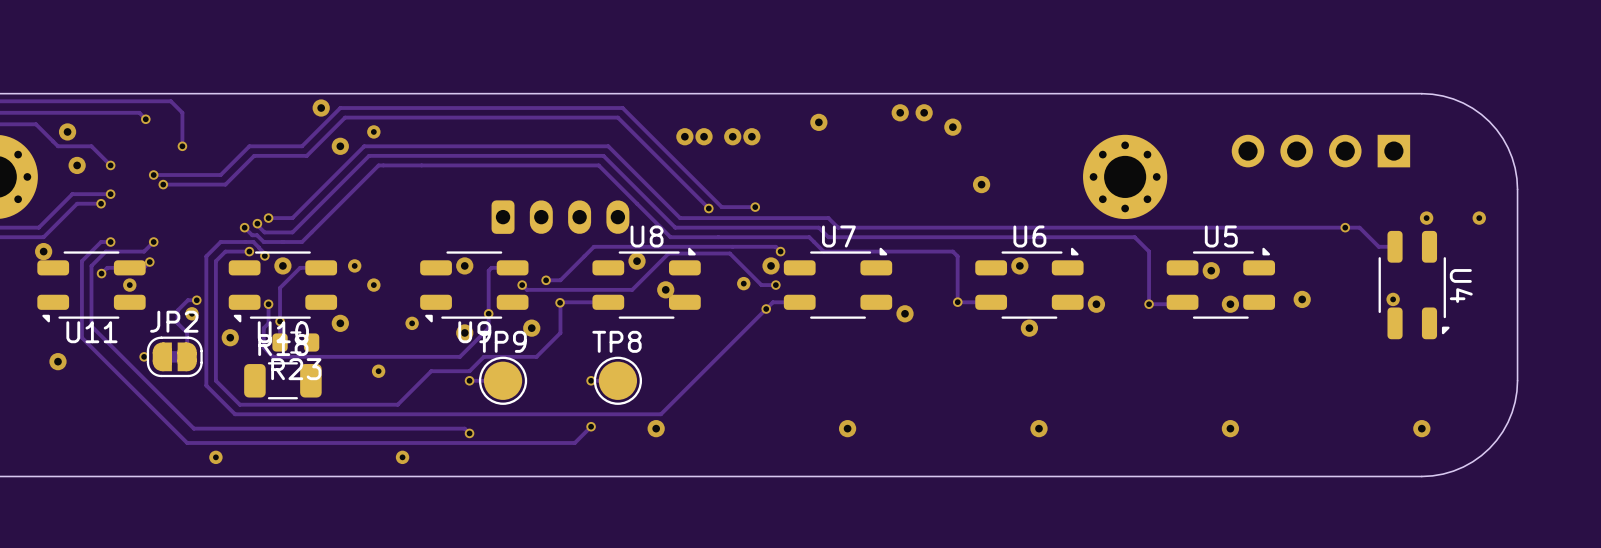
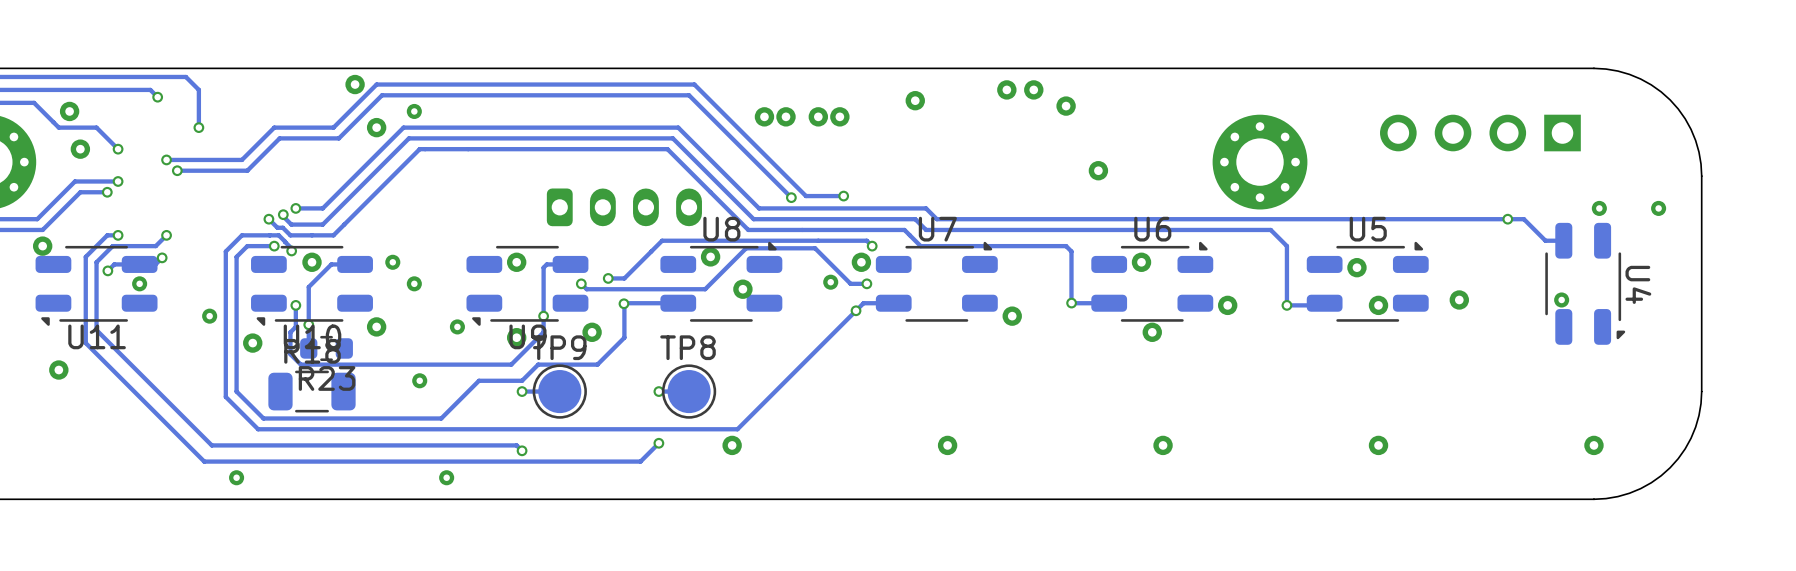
track: (196, 300) (187, 300) (177, 310) (177, 323) (187, 332) (187, 356) -> none
via: (196, 300) -> none
via: (144, 356) -> none
JP2: (174, 356) -> none

